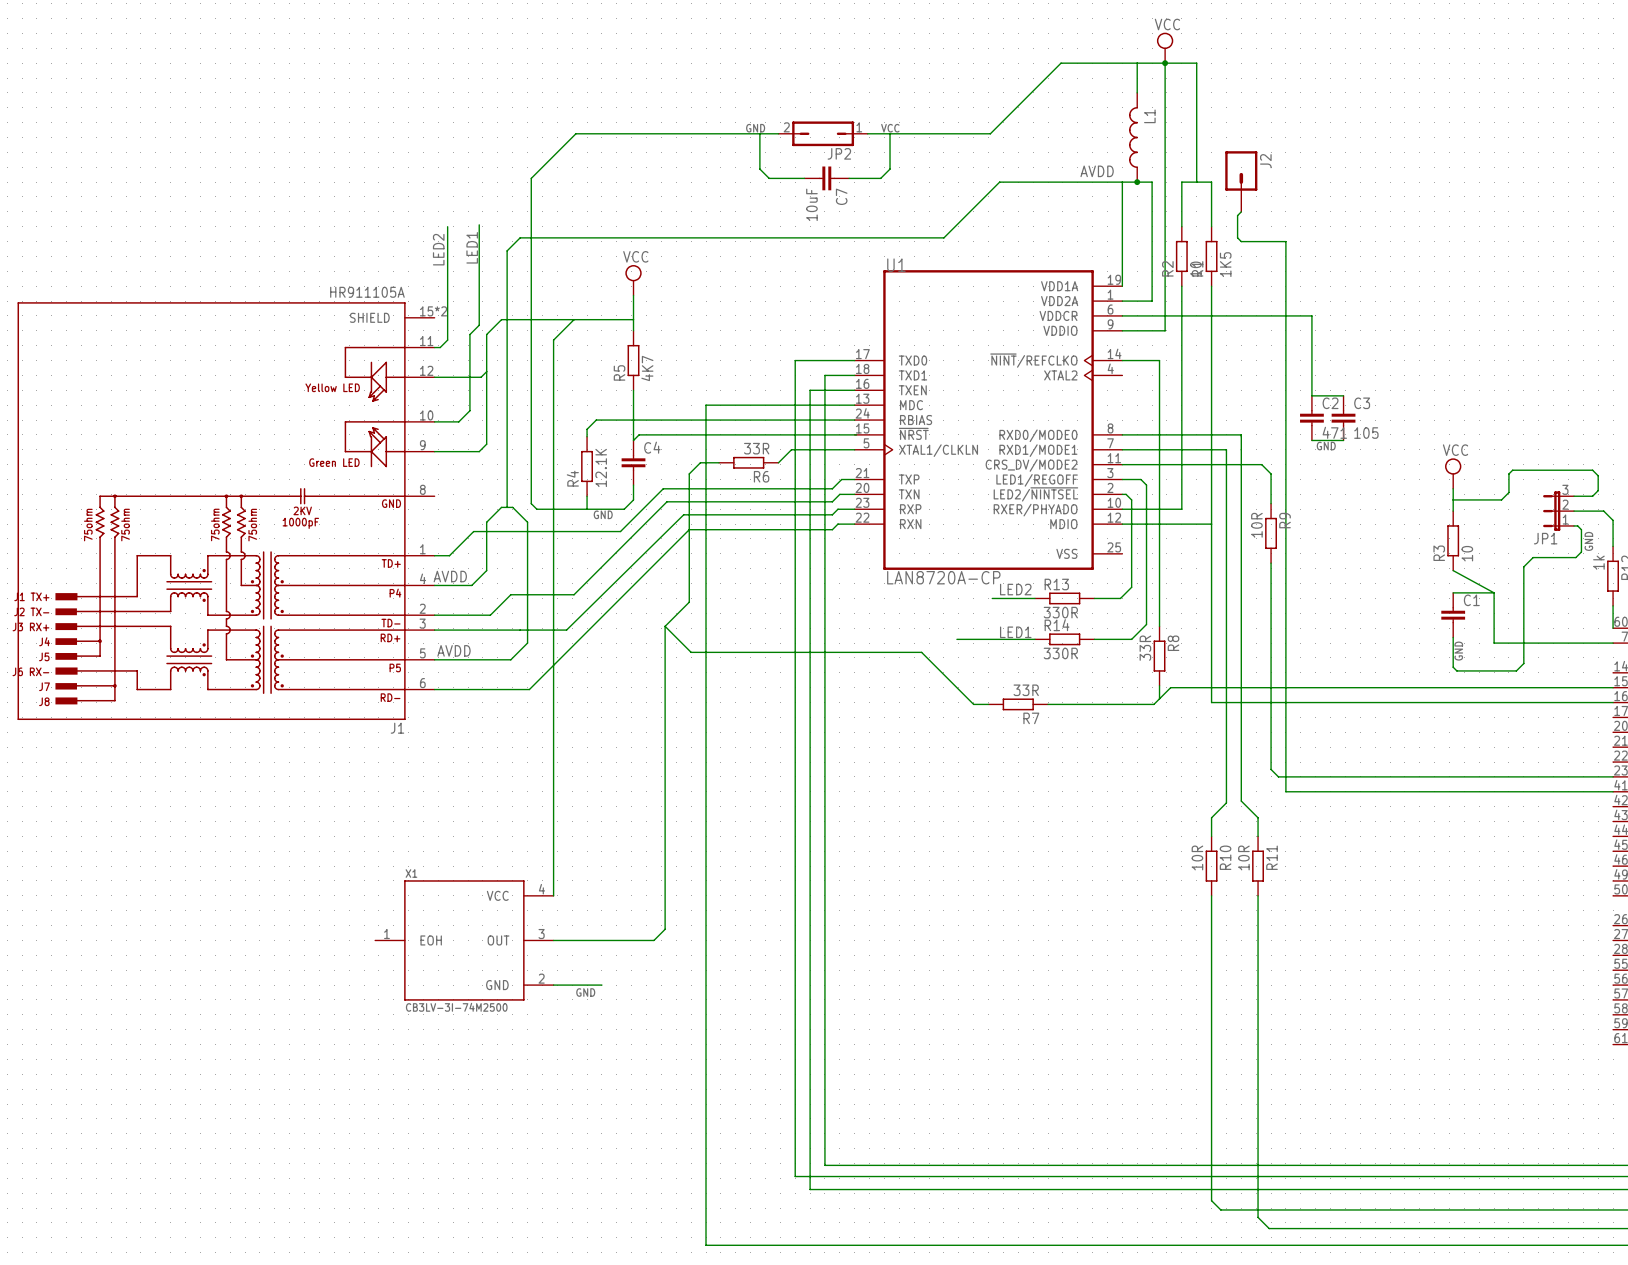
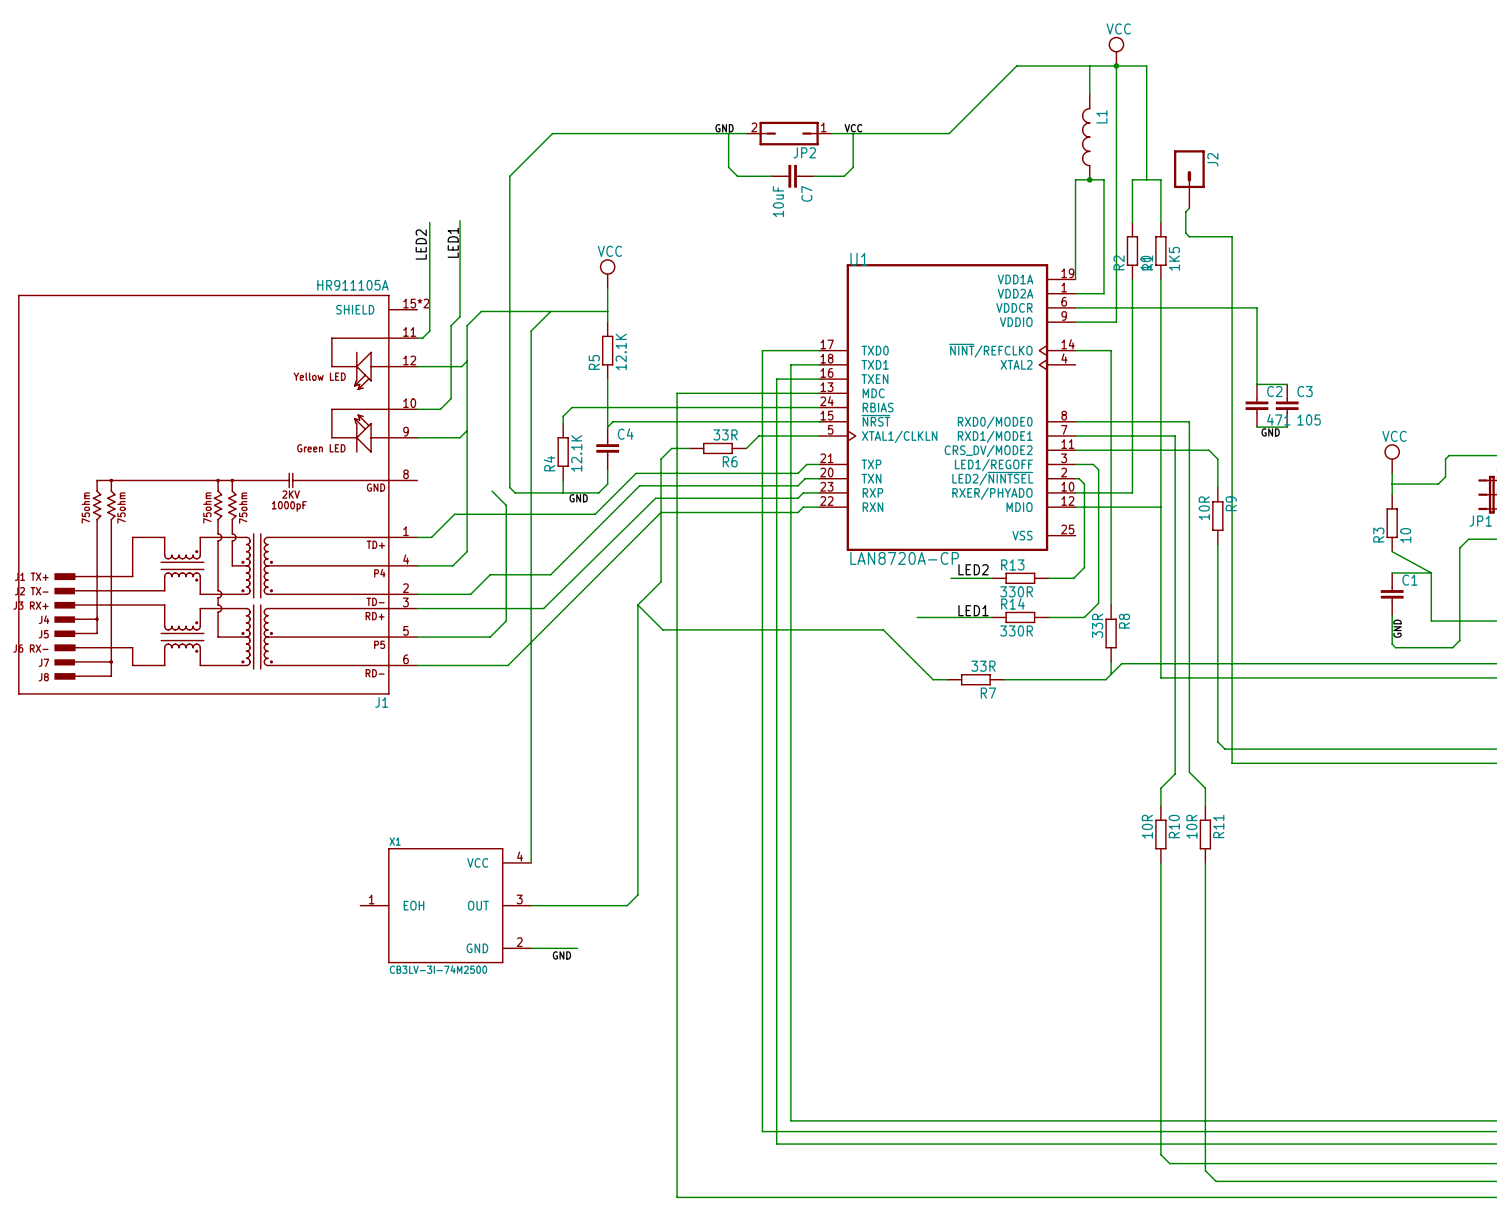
label: AVDD (1097, 171) -> none
wire: (1122, 182) (999, 182) (943, 237) (520, 237) (507, 250) (507, 507) -> none
R5 value: 4K7 (647, 368) -> 12.1K (621, 352)
wire: (512, 507) (501, 507) (486, 522) -> (467, 430) (467, 505)
label: AVDD (450, 576) -> none
label: AVDD (453, 650) -> none

